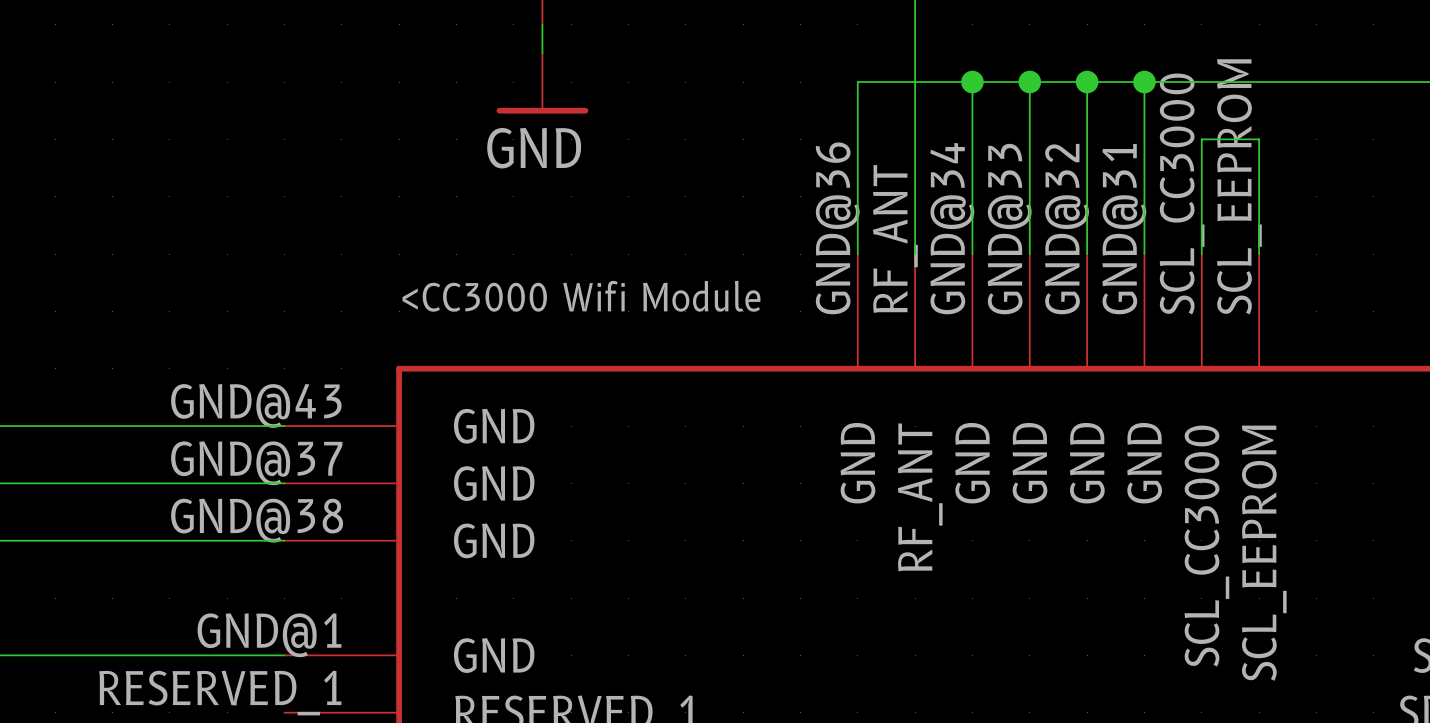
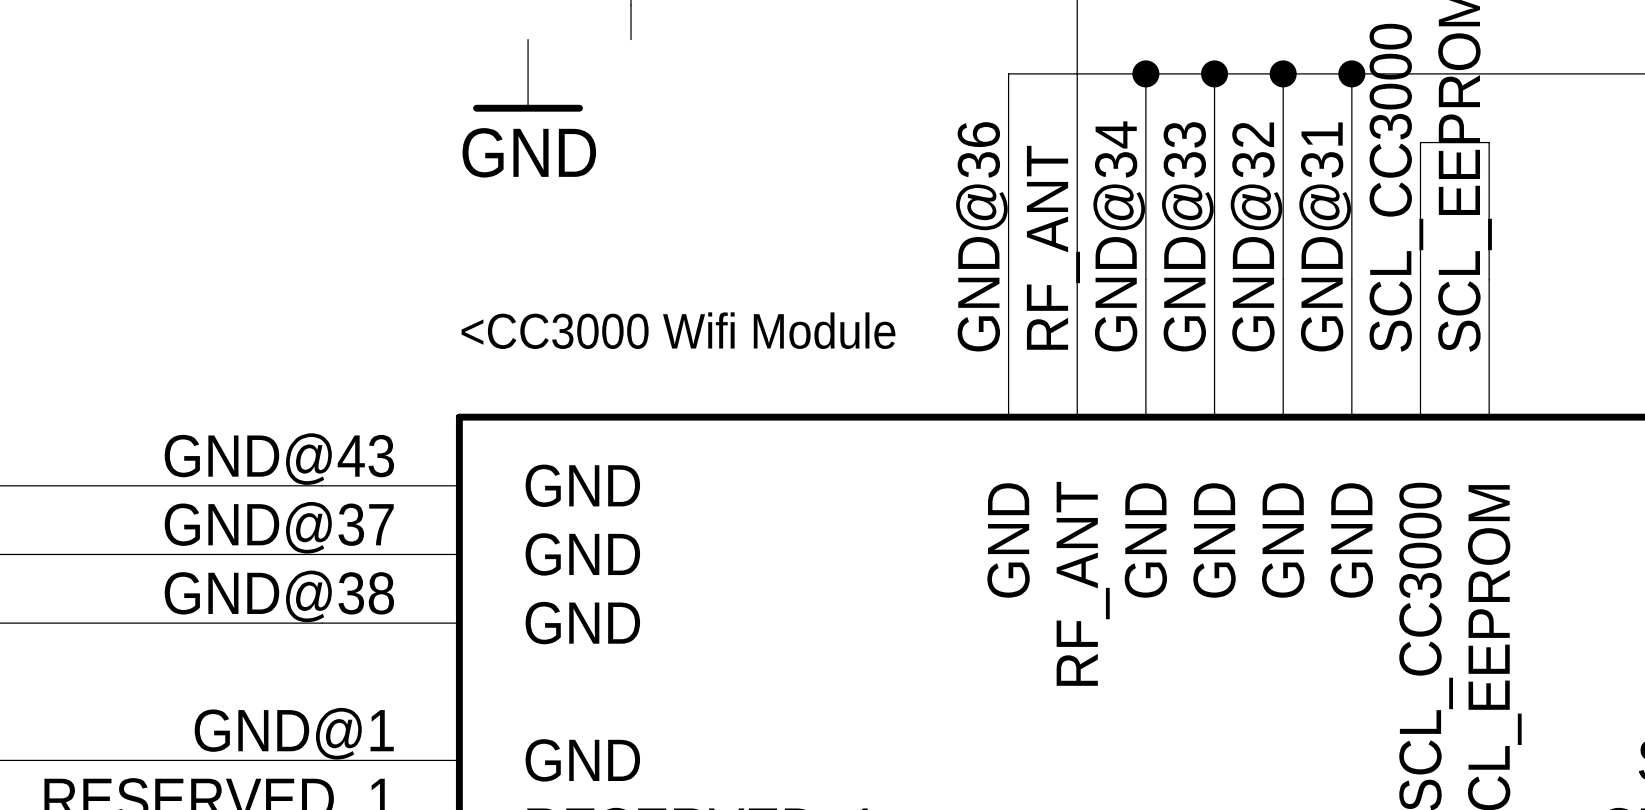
power symbol position: GND (542, 83) -> GND (528, 75)

